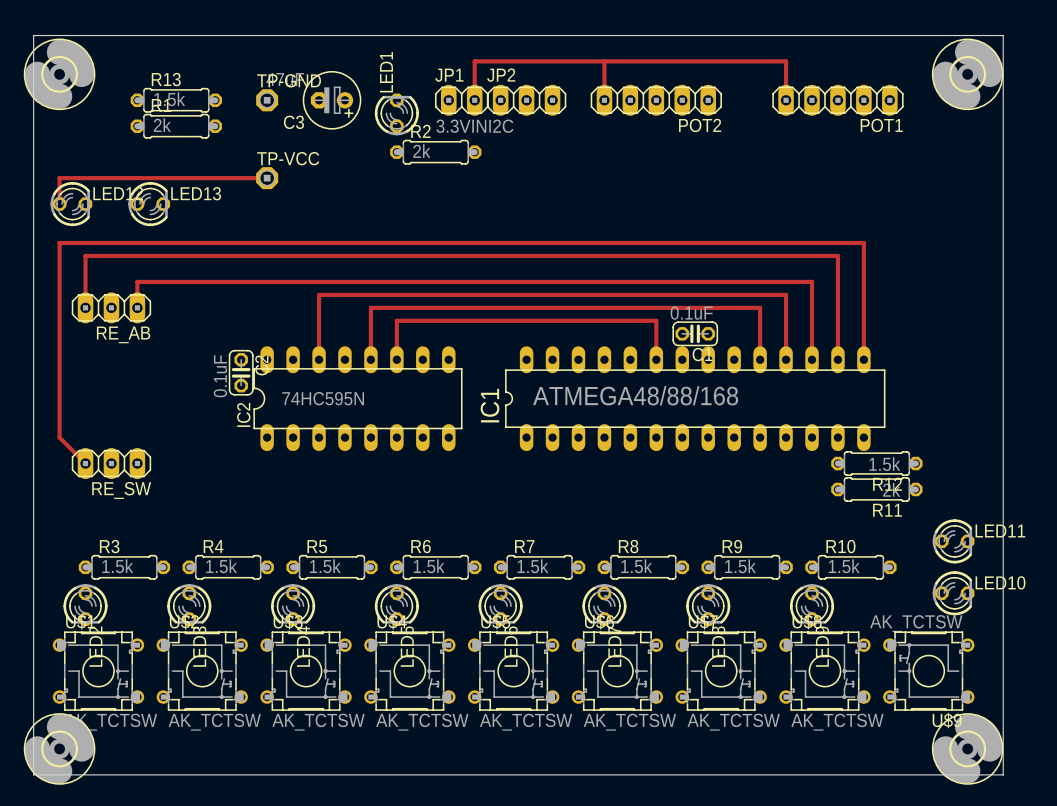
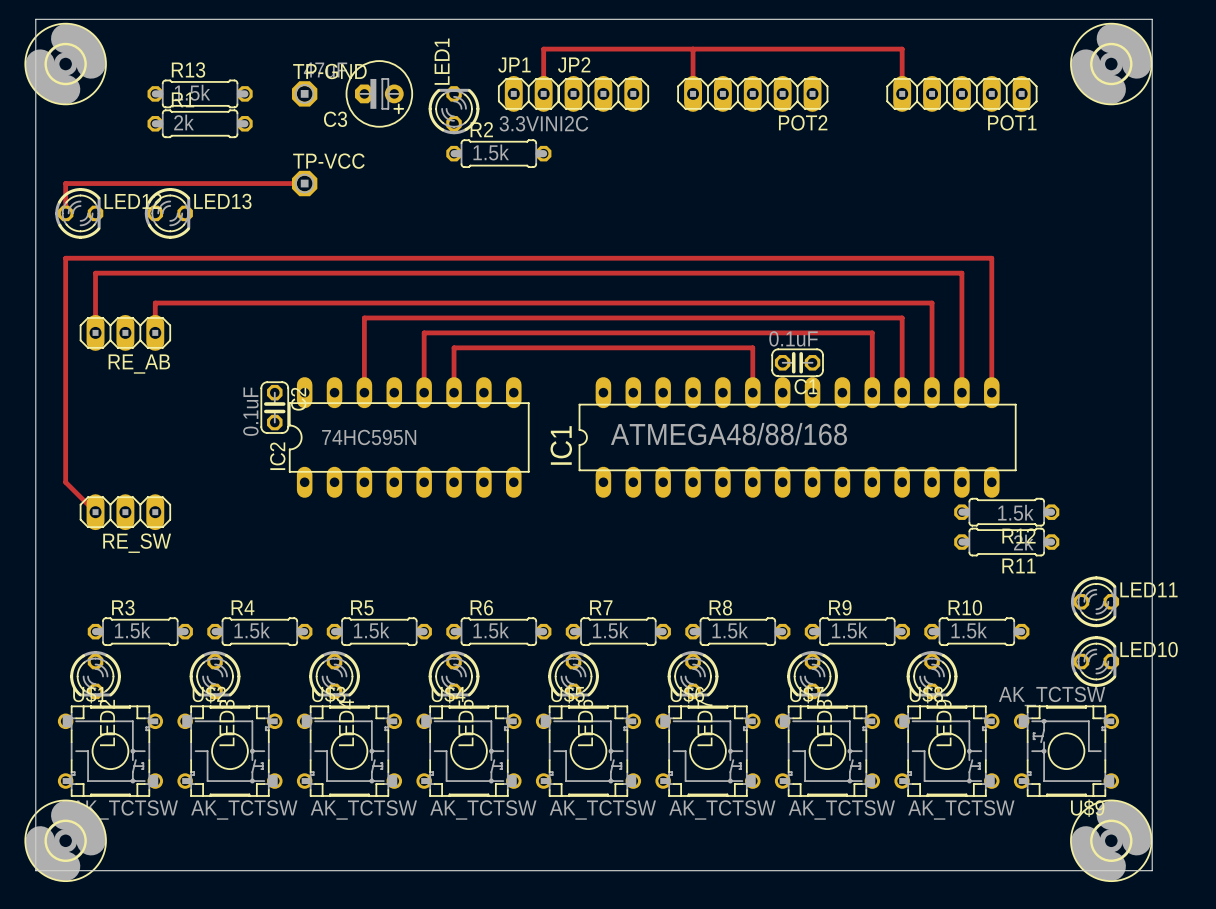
R2 value: 2k (421, 151) -> 1.5k (491, 152)

